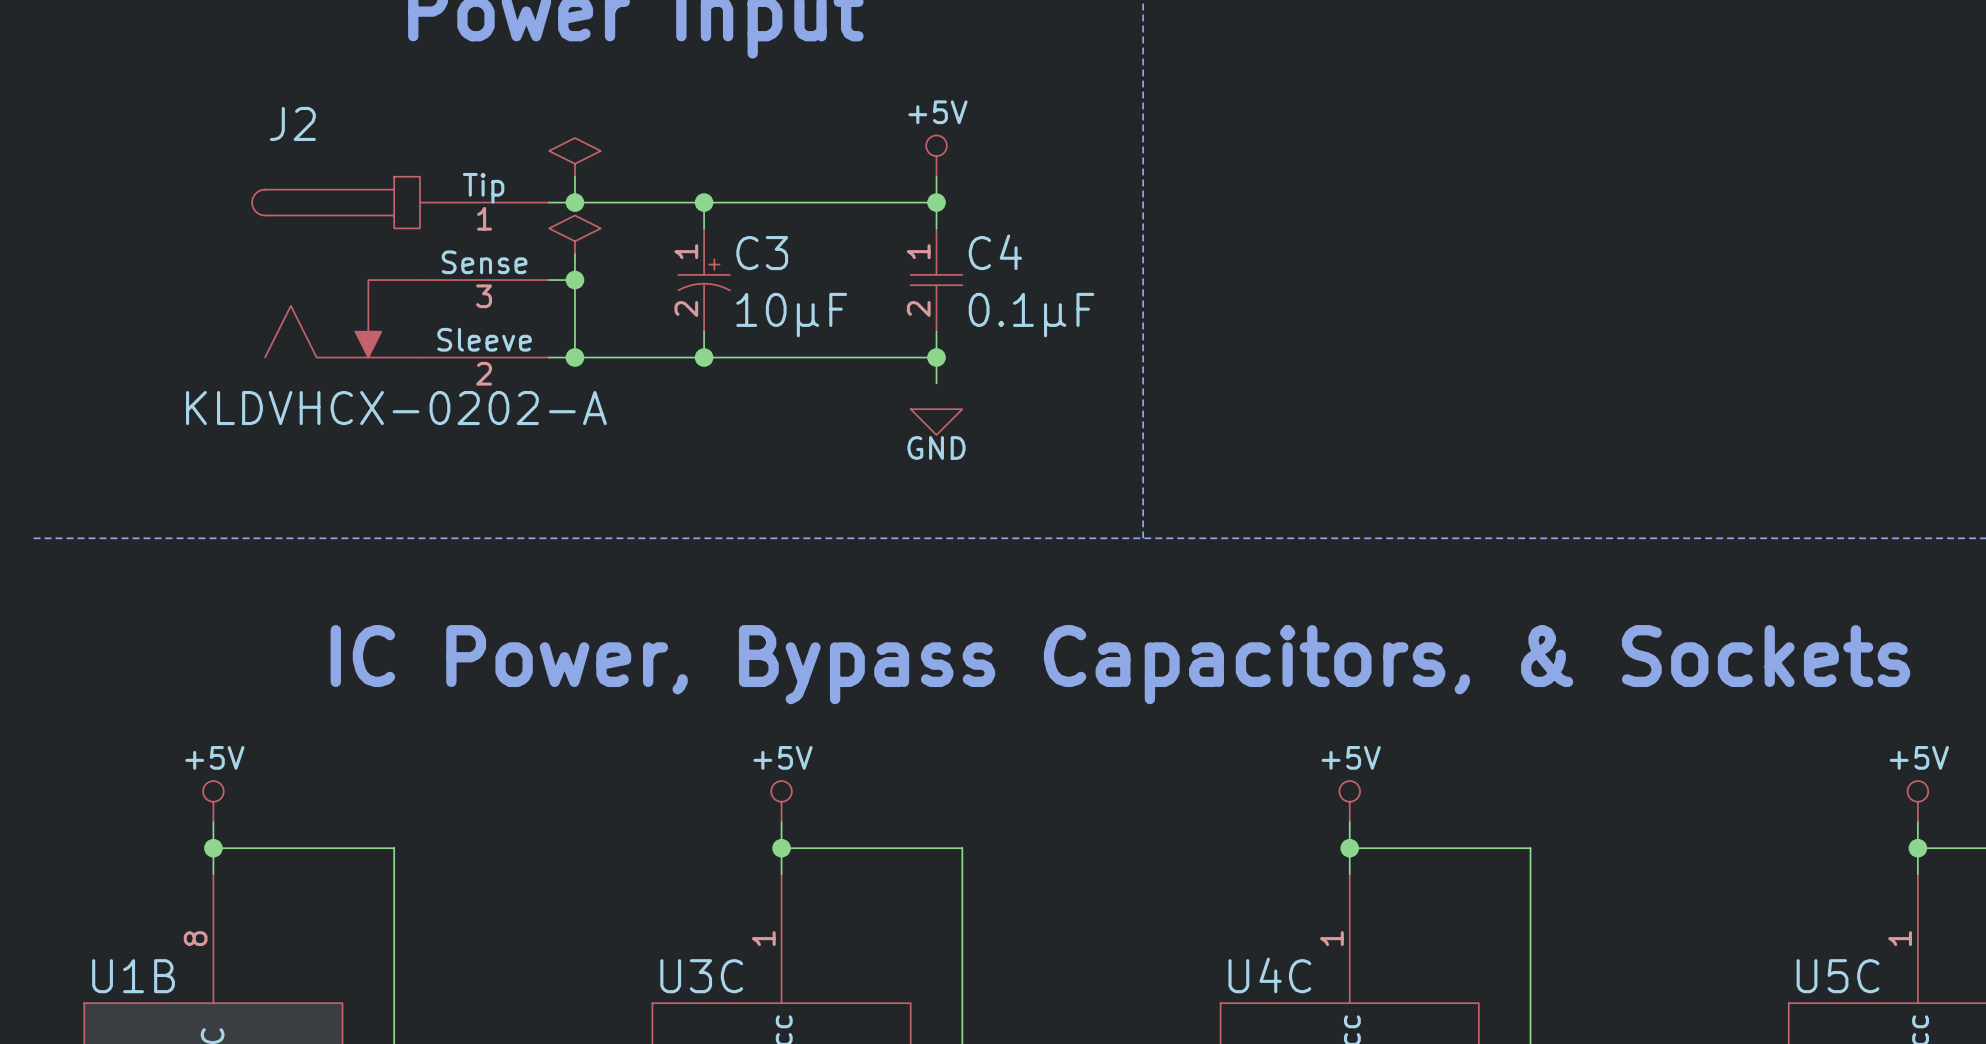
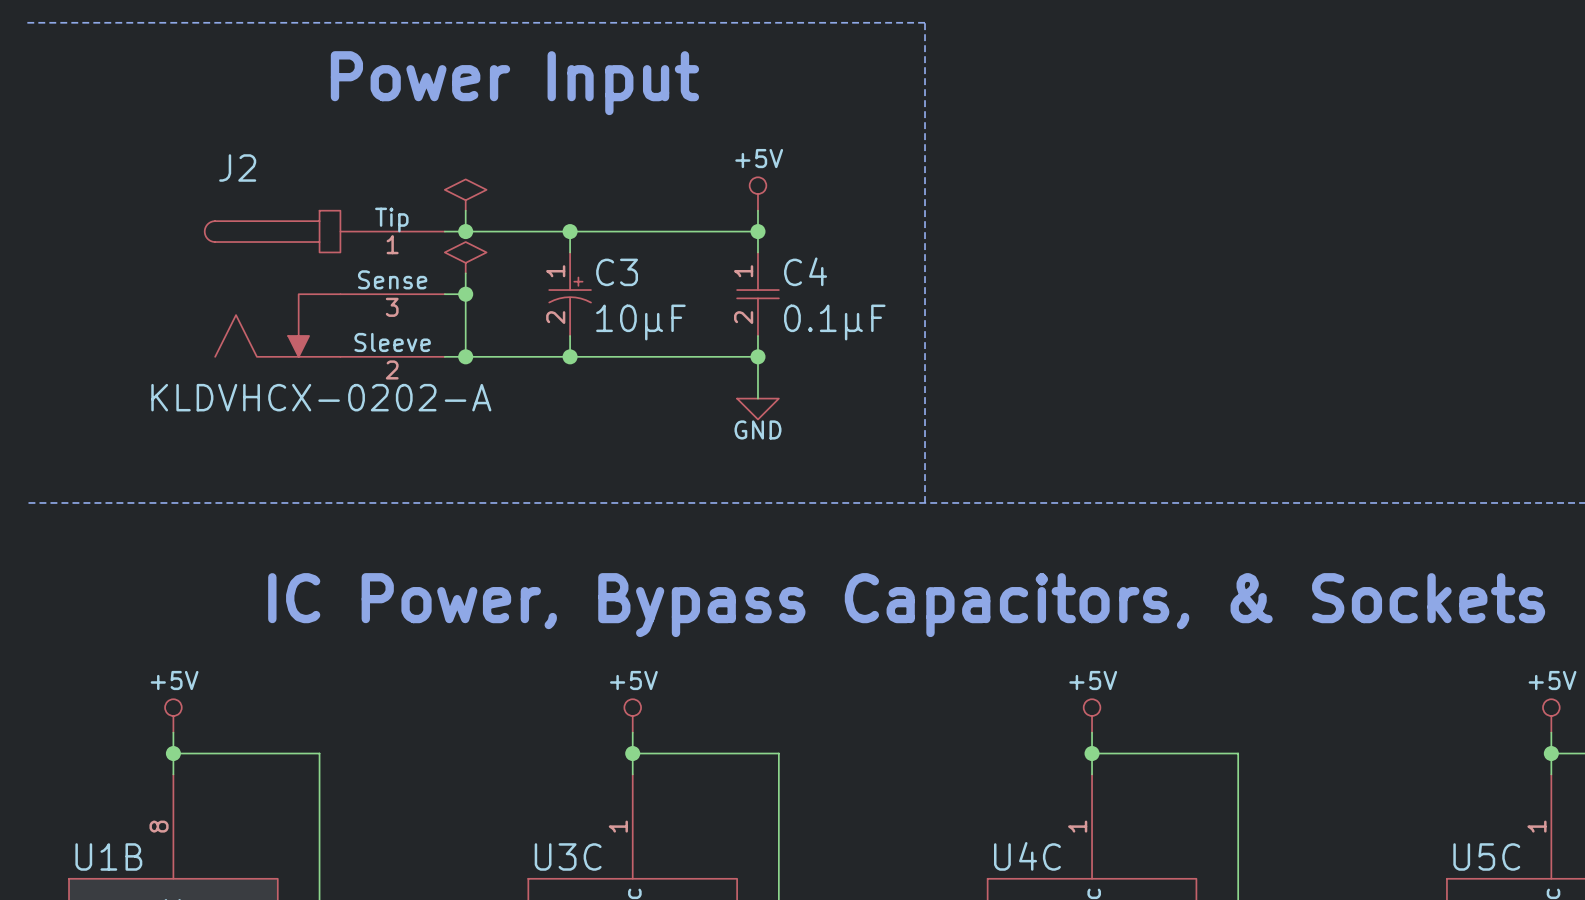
wire: none -> (757, 377) (757, 398)

